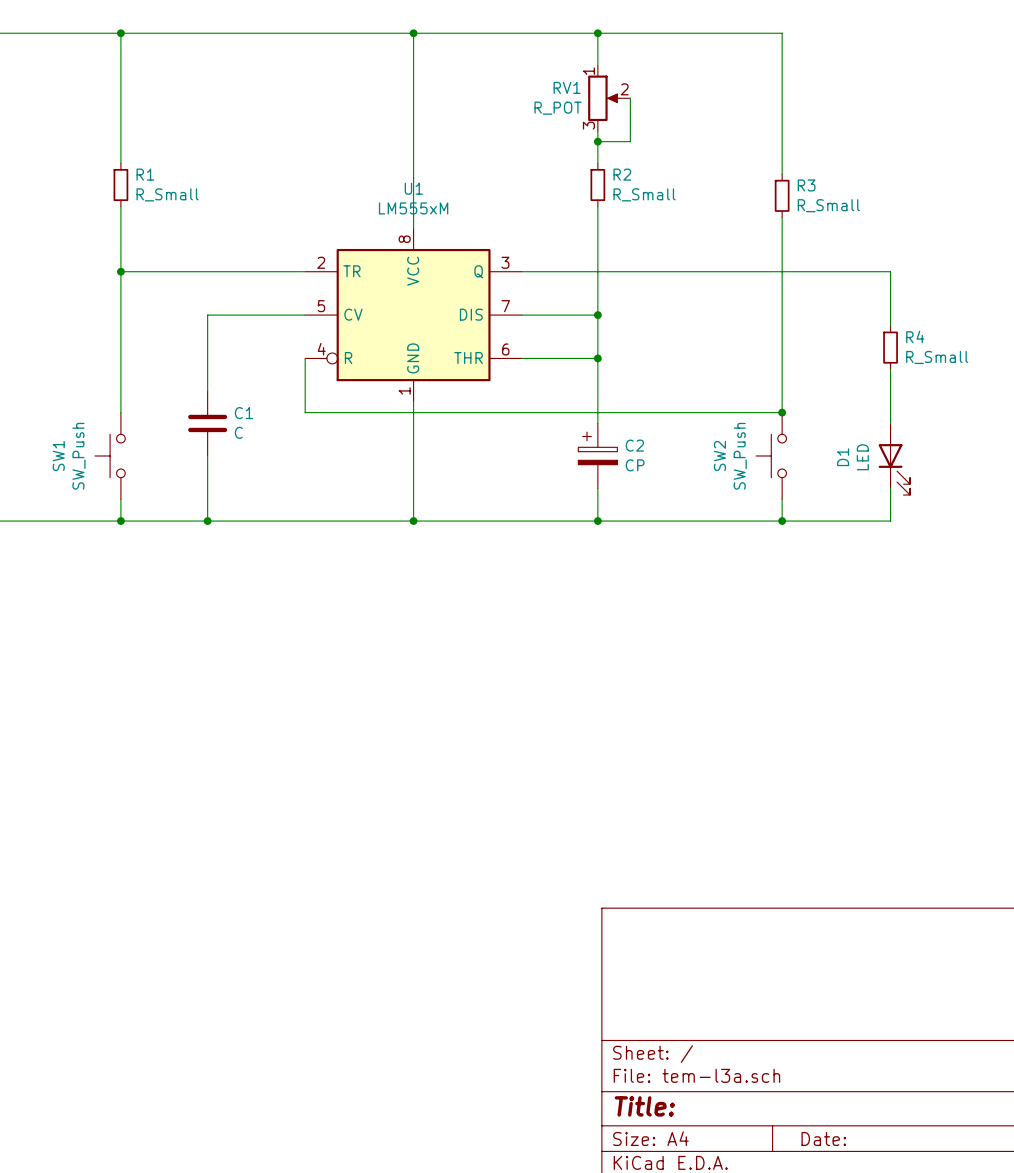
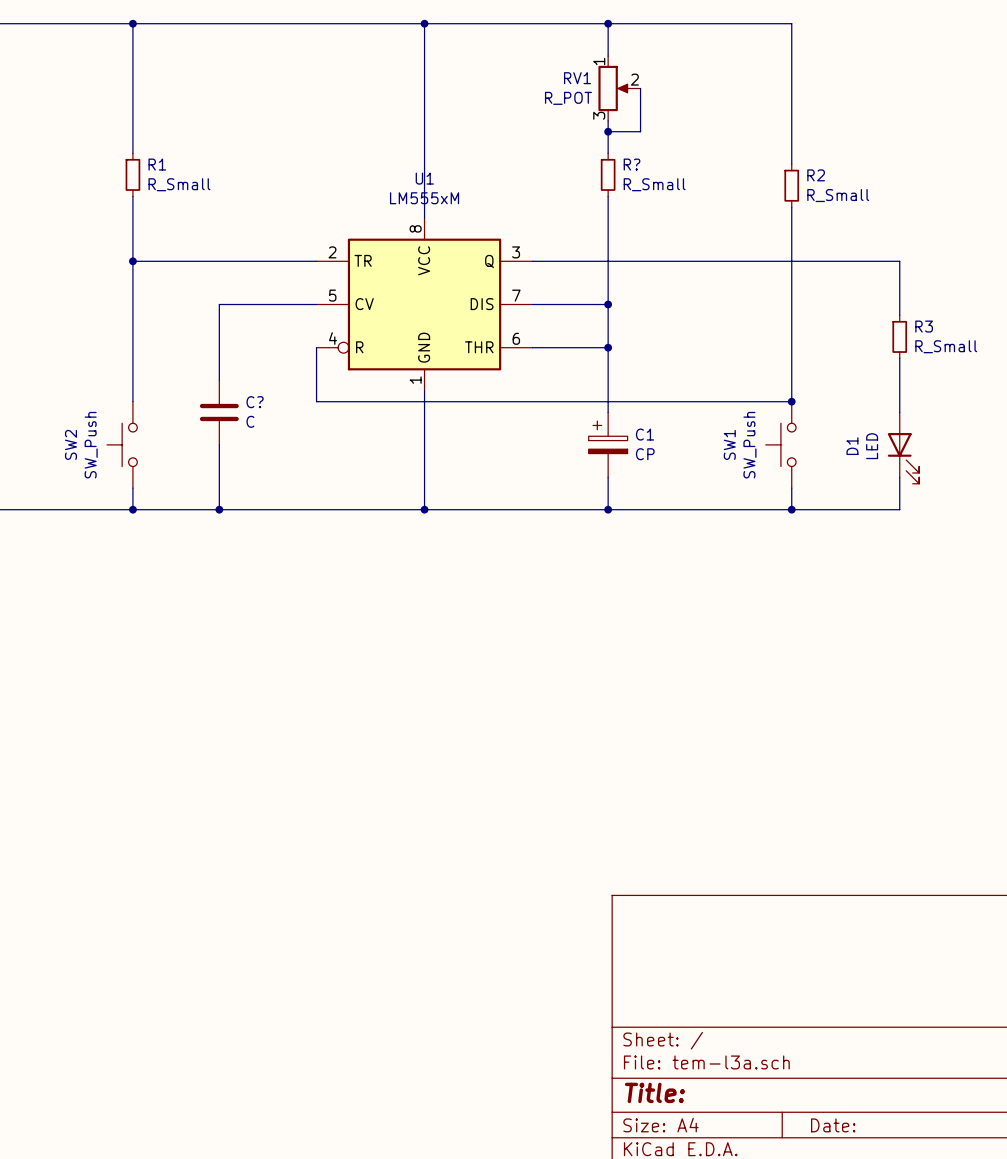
R2 name: R2 (622, 174) -> R? (632, 164)
R3 name: R3 (806, 185) -> R2 (816, 175)
R4 name: R4 (915, 336) -> R3 (924, 326)
C1 name: C1 (244, 413) -> C? (255, 402)
C2 name: C2 (634, 445) -> C1 (645, 434)
SW1 name: SW1 (58, 455) -> SW2 (70, 444)
SW2 name: SW2 (719, 455) -> SW1 (729, 444)

